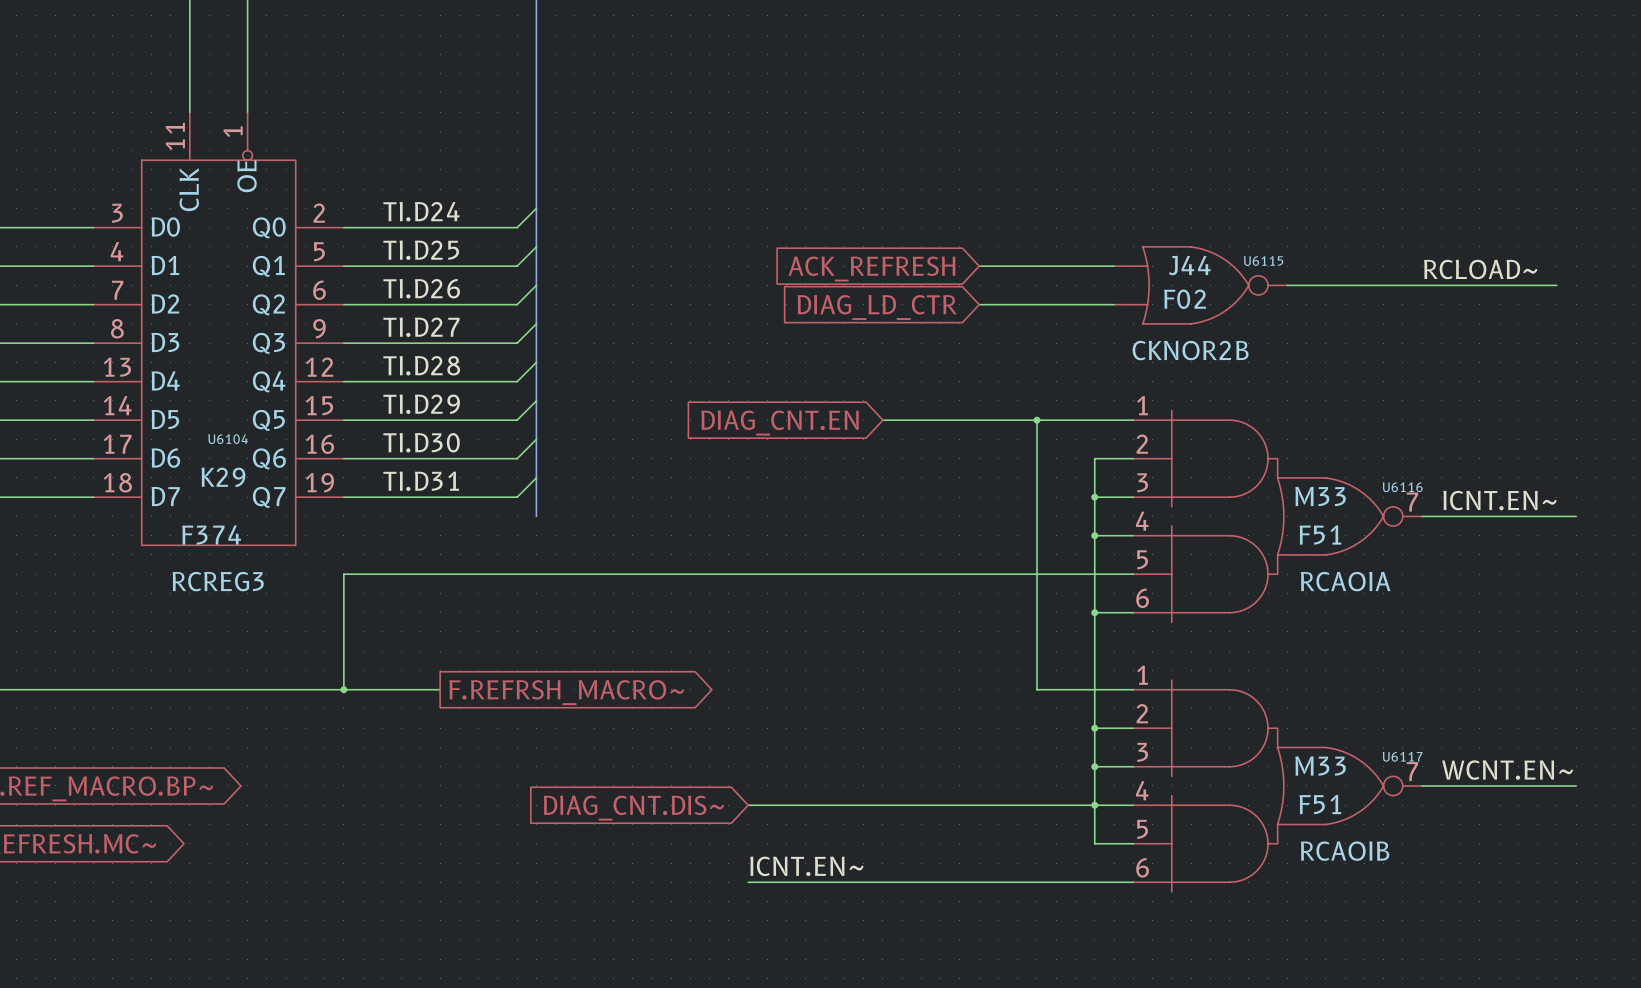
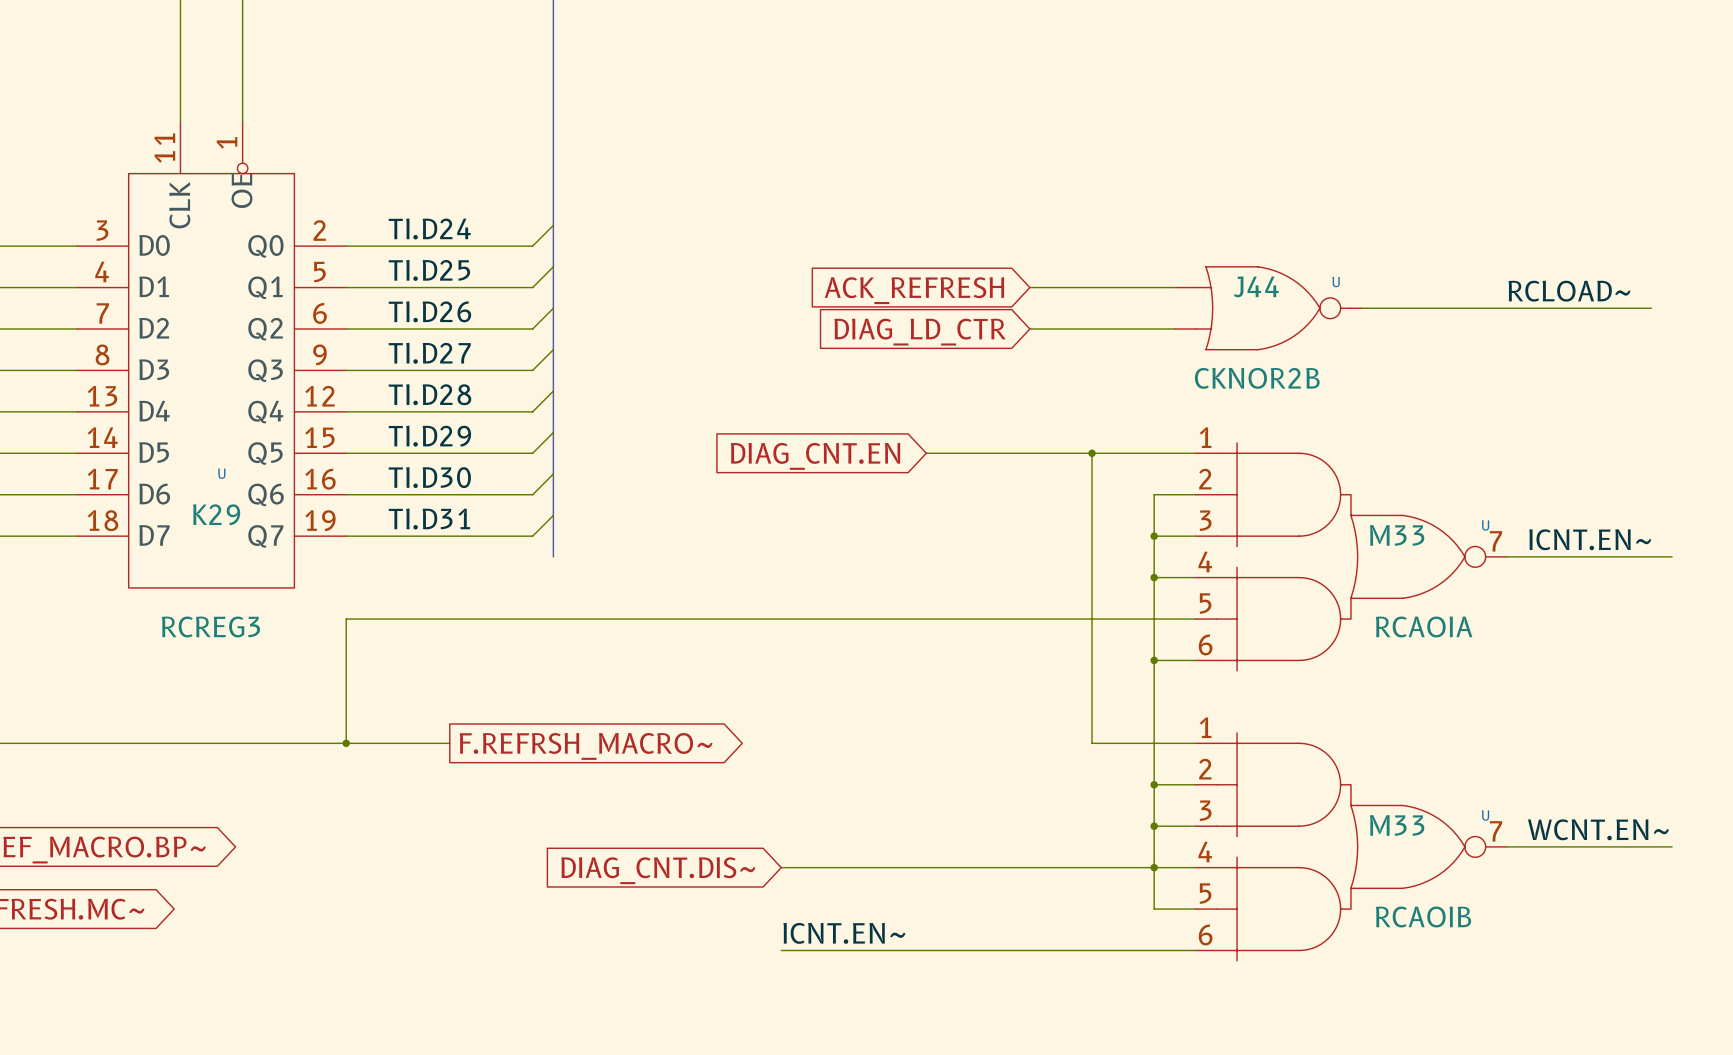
U6115 name: U6115 (1263, 261) -> U (1336, 282)
U6115 value: F02 (1185, 299) -> none
U6104 name: U6104 (228, 439) -> U (221, 473)
U6116 name: U6116 (1402, 487) -> U (1485, 525)
U6104 value: F374 (211, 534) -> none
U6116 value: F51 (1320, 534) -> none
U6117 name: U6117 (1402, 756) -> U (1485, 815)
U6117 value: F51 (1320, 804) -> none

